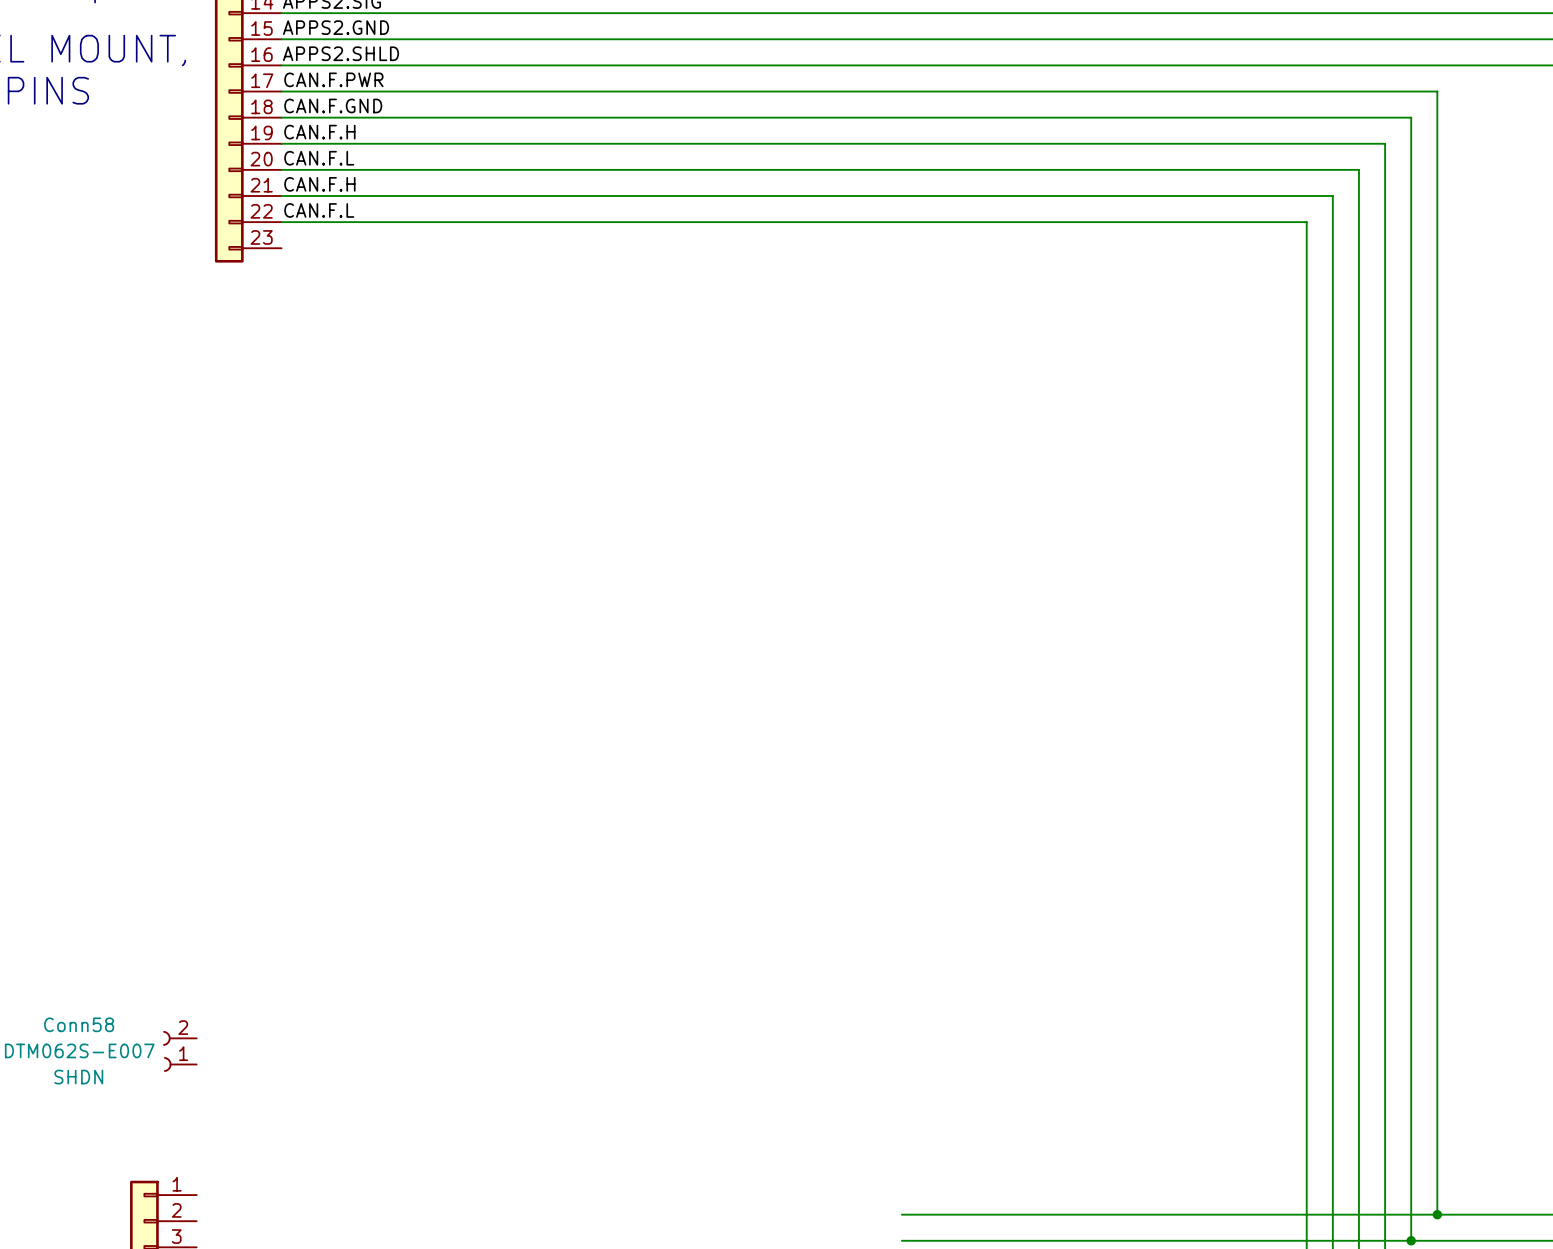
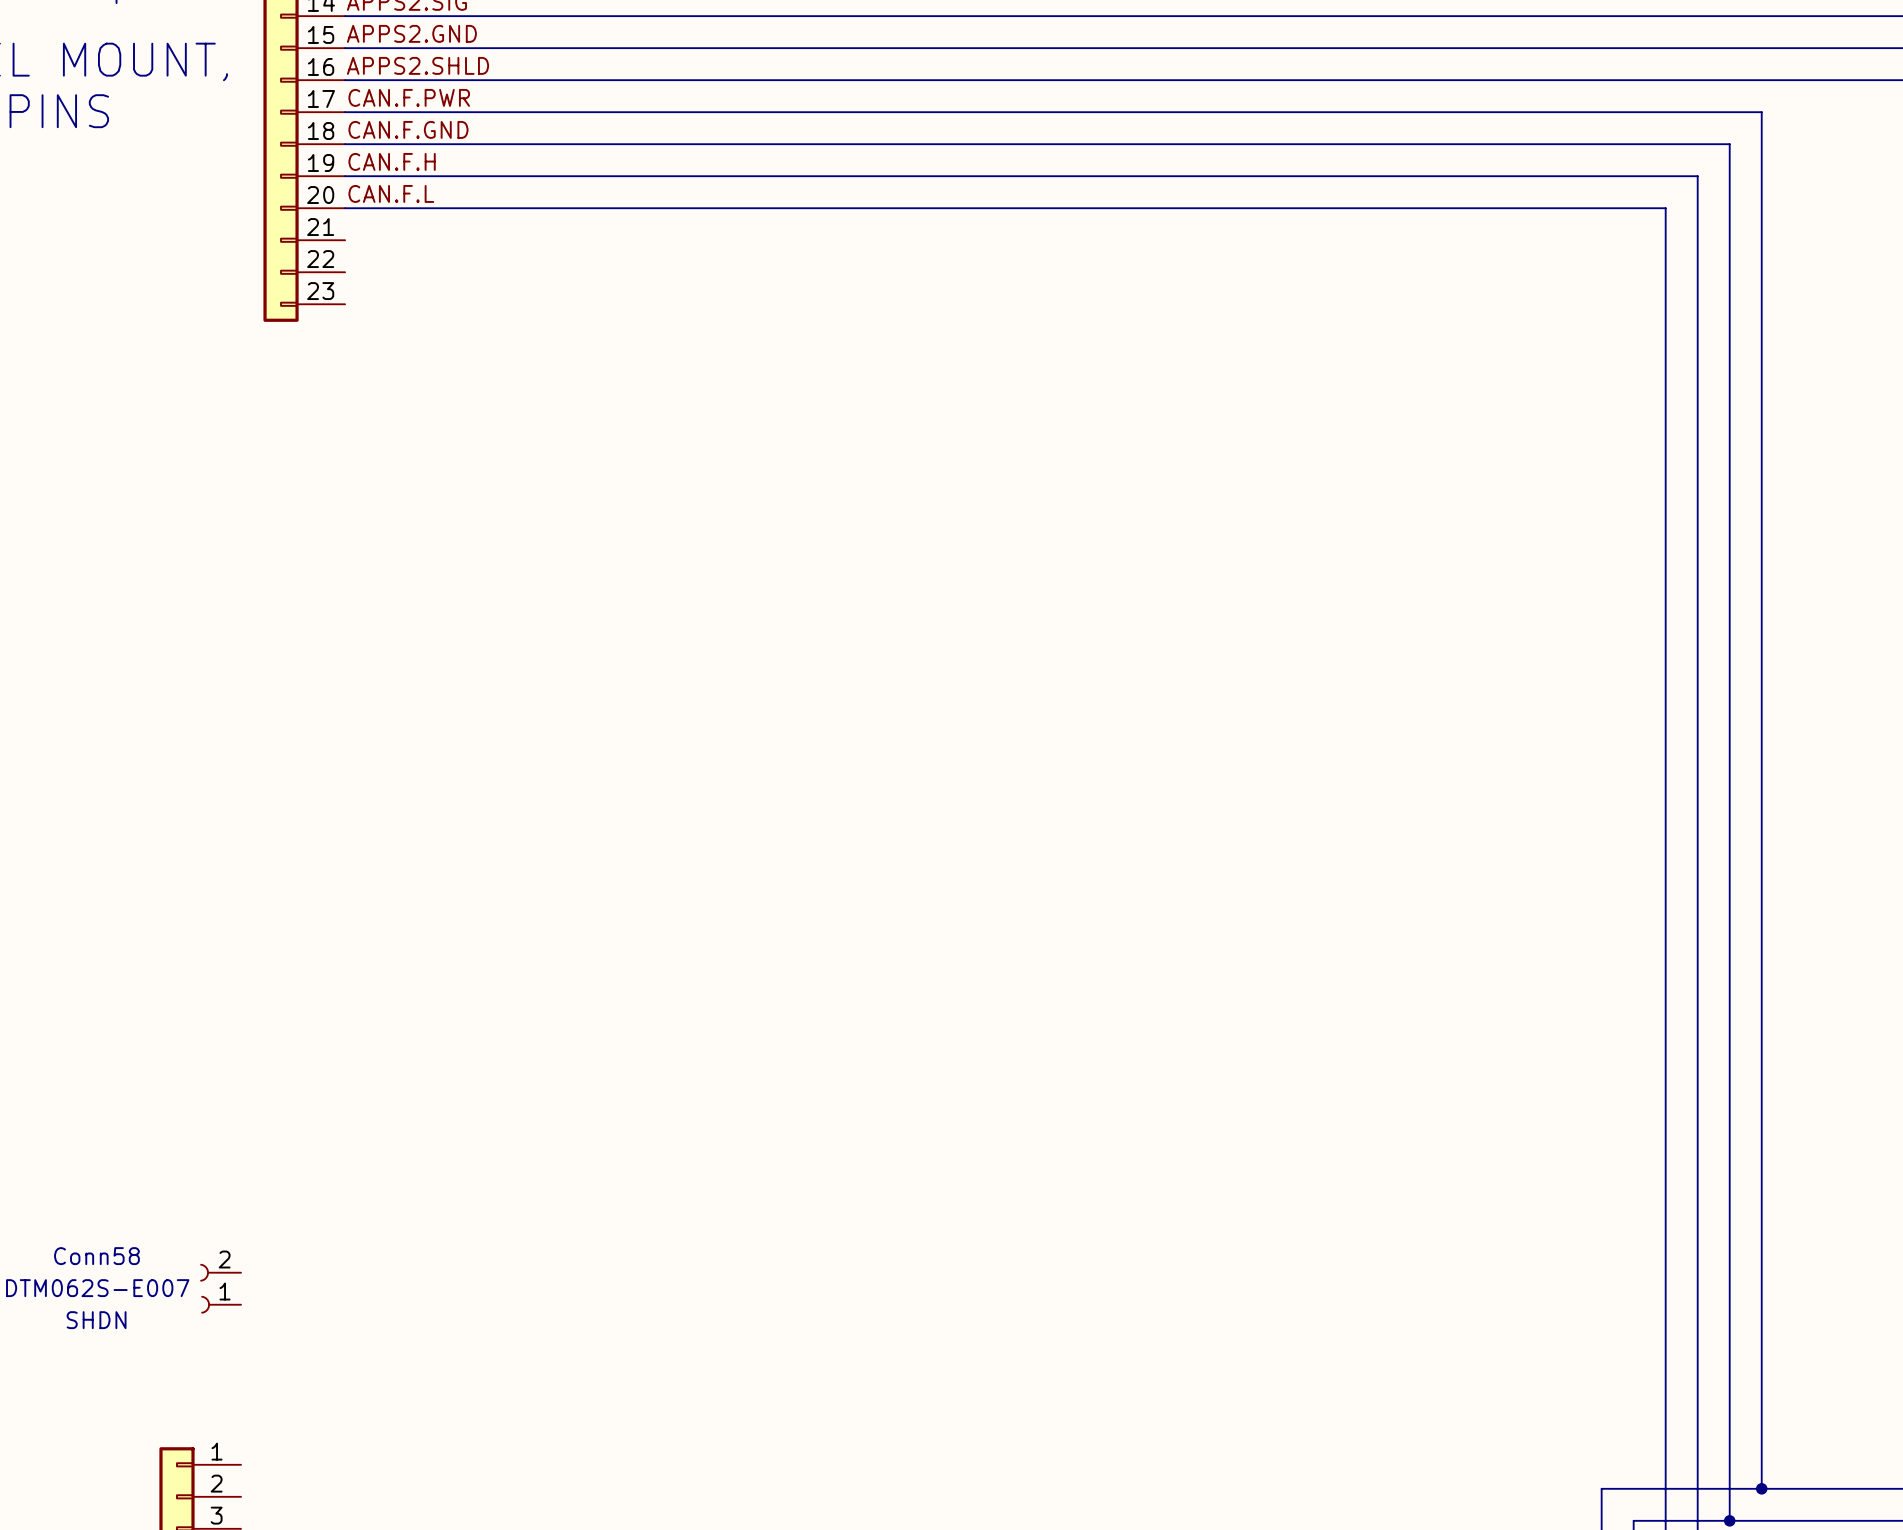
label: CAN.F.H (319, 184) -> none
wire: (281, 196) (1332, 196) (1332, 1240) (901, 1240) -> none
label: CAN.F.L (319, 210) -> none
wire: (281, 222) (1306, 222) (1306, 1214) (901, 1214) -> none

